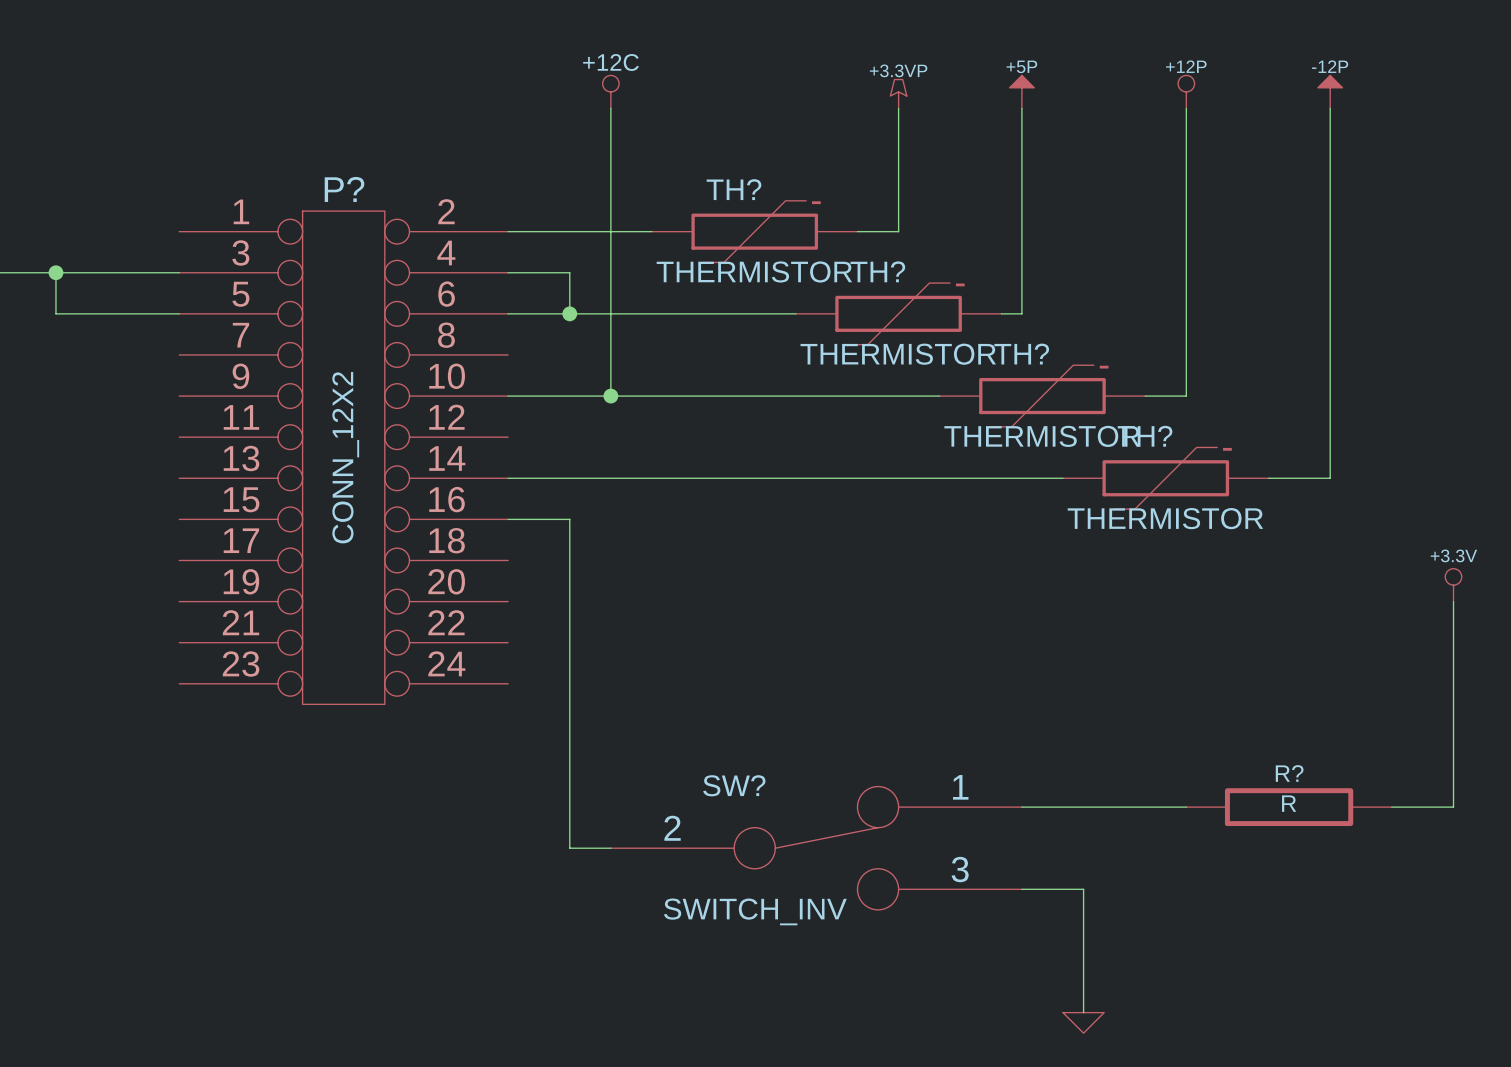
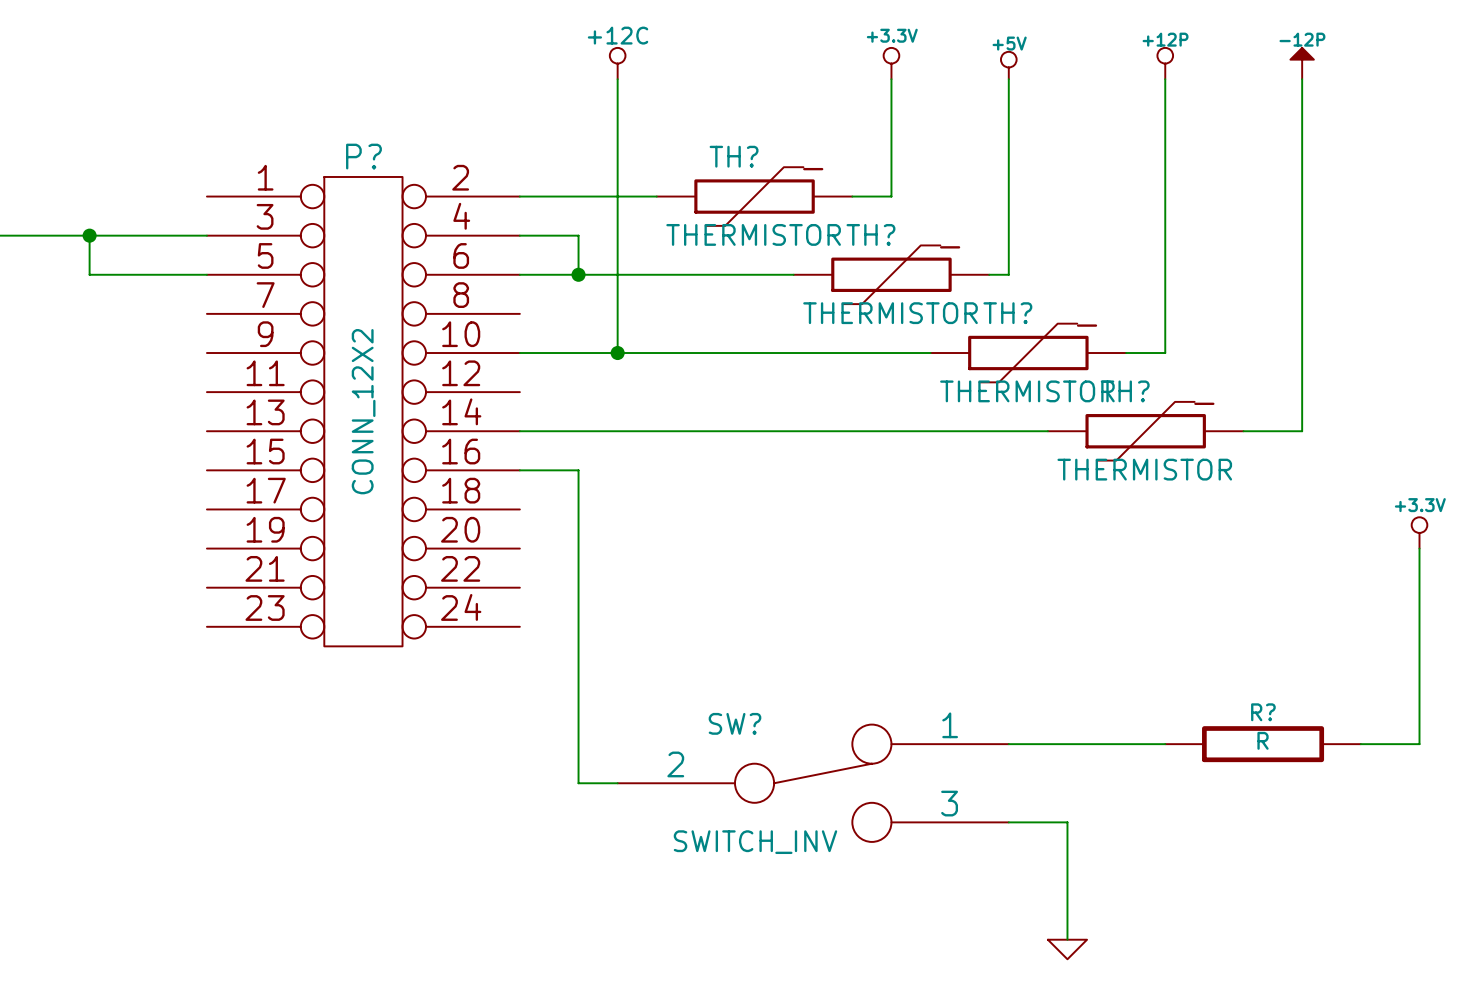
power symbol: +5P (1021, 91) -> +5V (1008, 65)
power symbol: +3.3VP (898, 93) -> +3.3V (891, 63)

